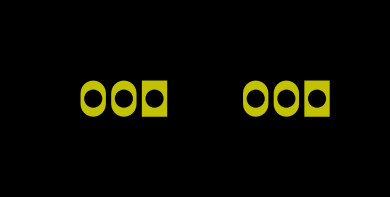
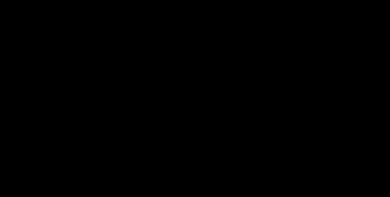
part: (123, 98) -> none
part: (286, 98) -> none

